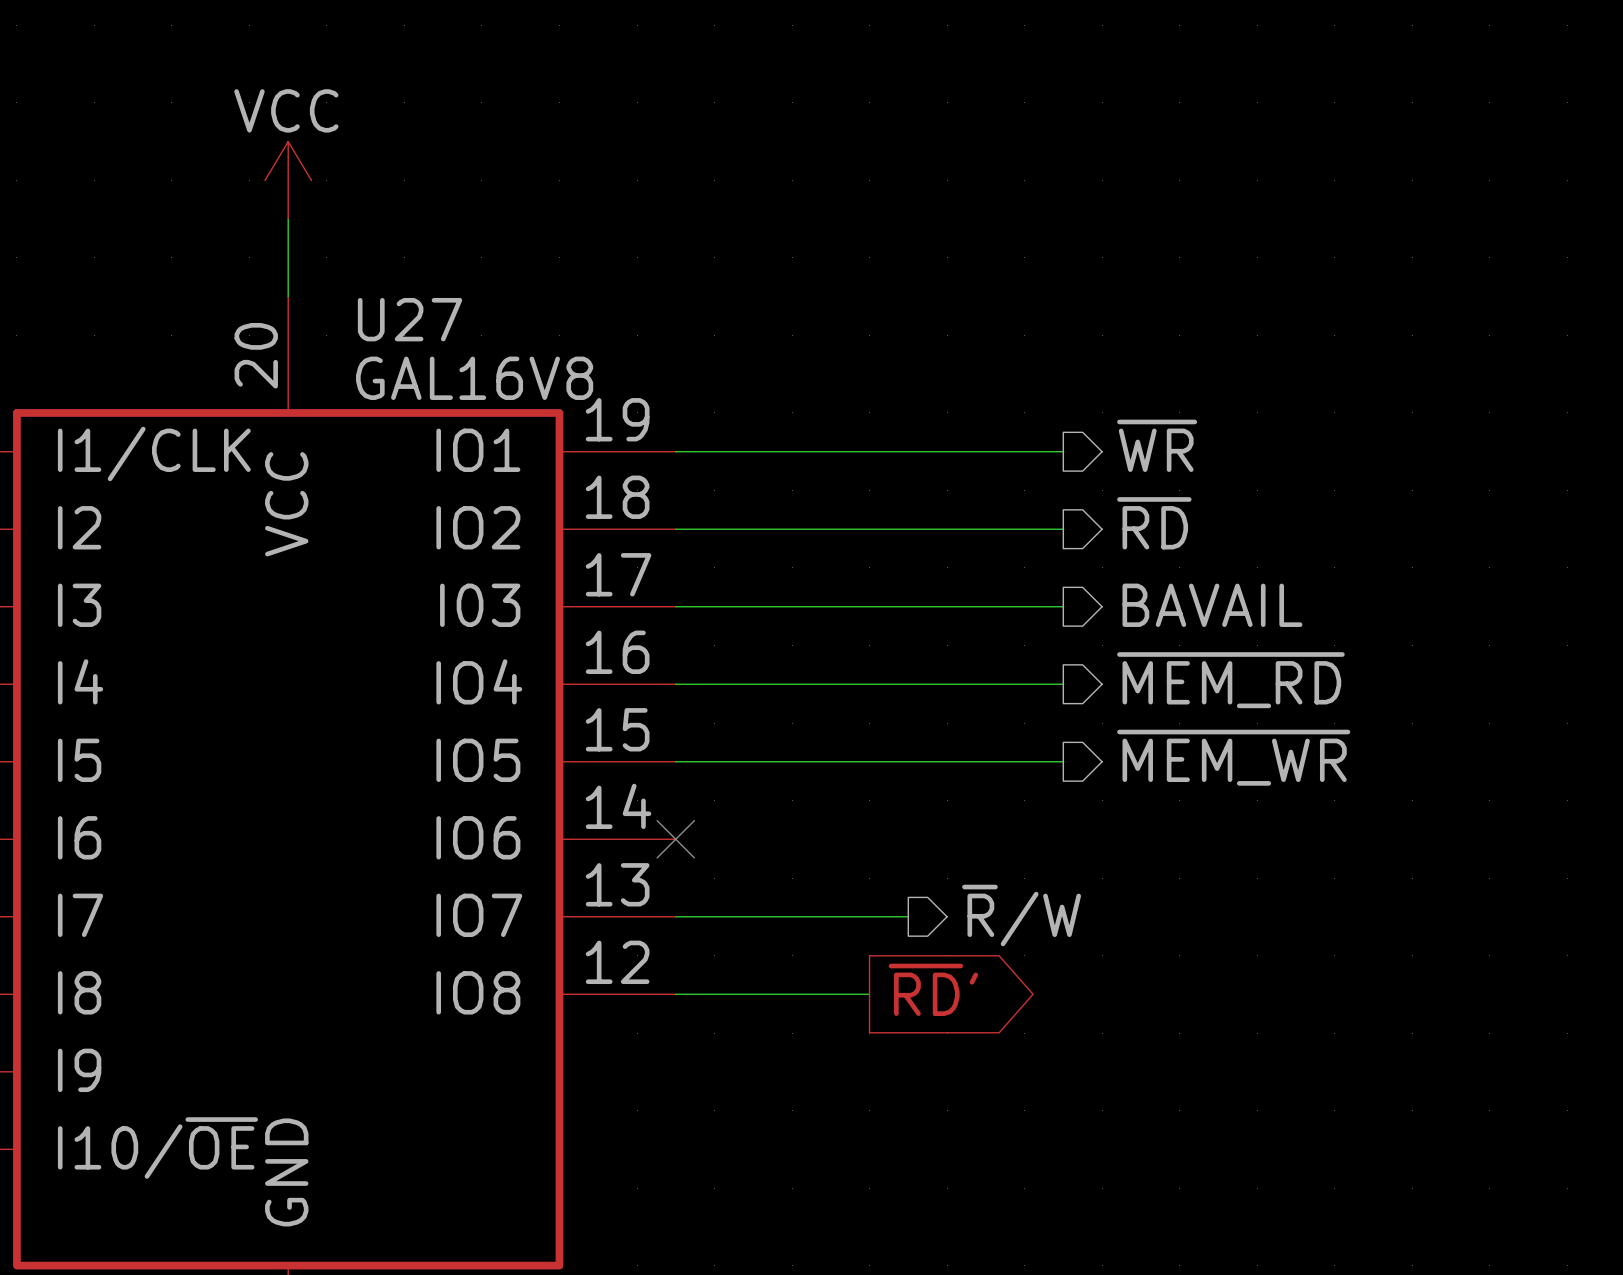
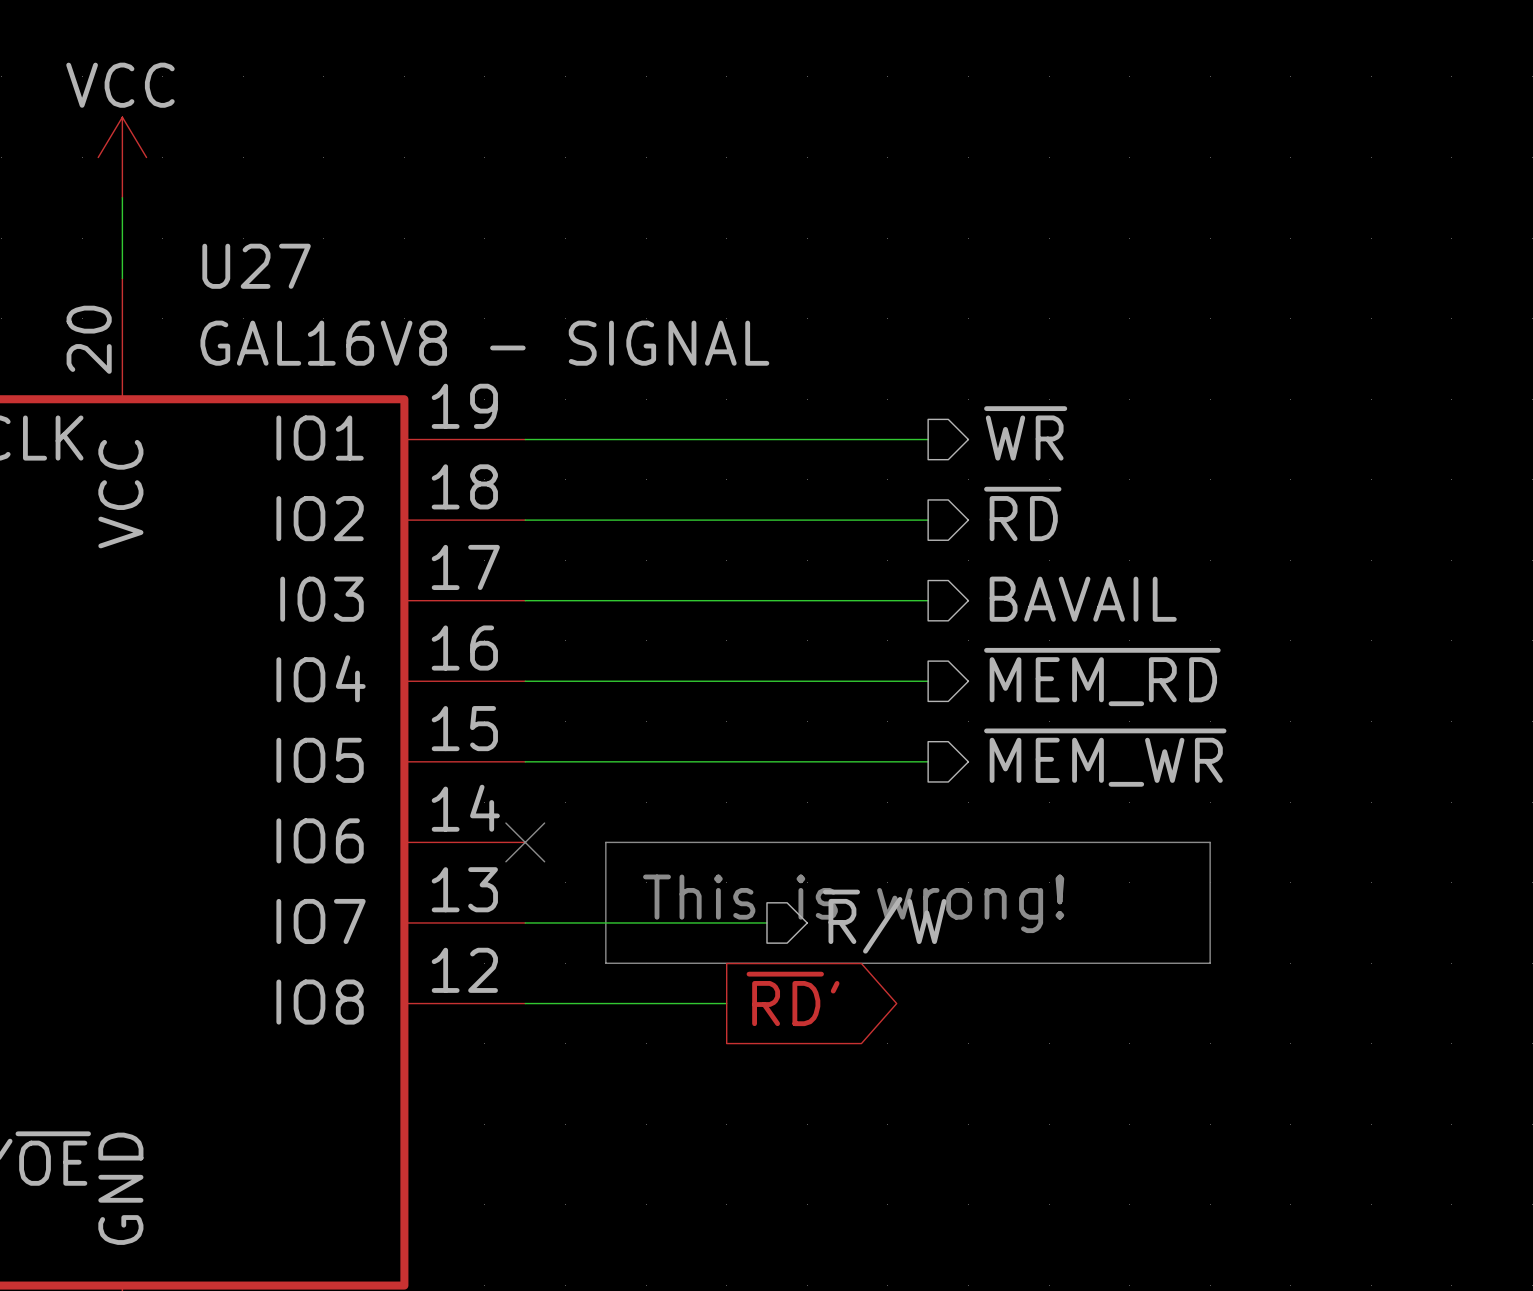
U27 name position: U27 (410, 319) -> U27 (256, 266)
U27 value: GAL16V8 (474, 378) -> GAL16V8 - SIGNAL (484, 343)
line: none -> (605, 842) (1210, 842) (1210, 963) (605, 963) (605, 842)
text: none -> This is wrong! (853, 903)

